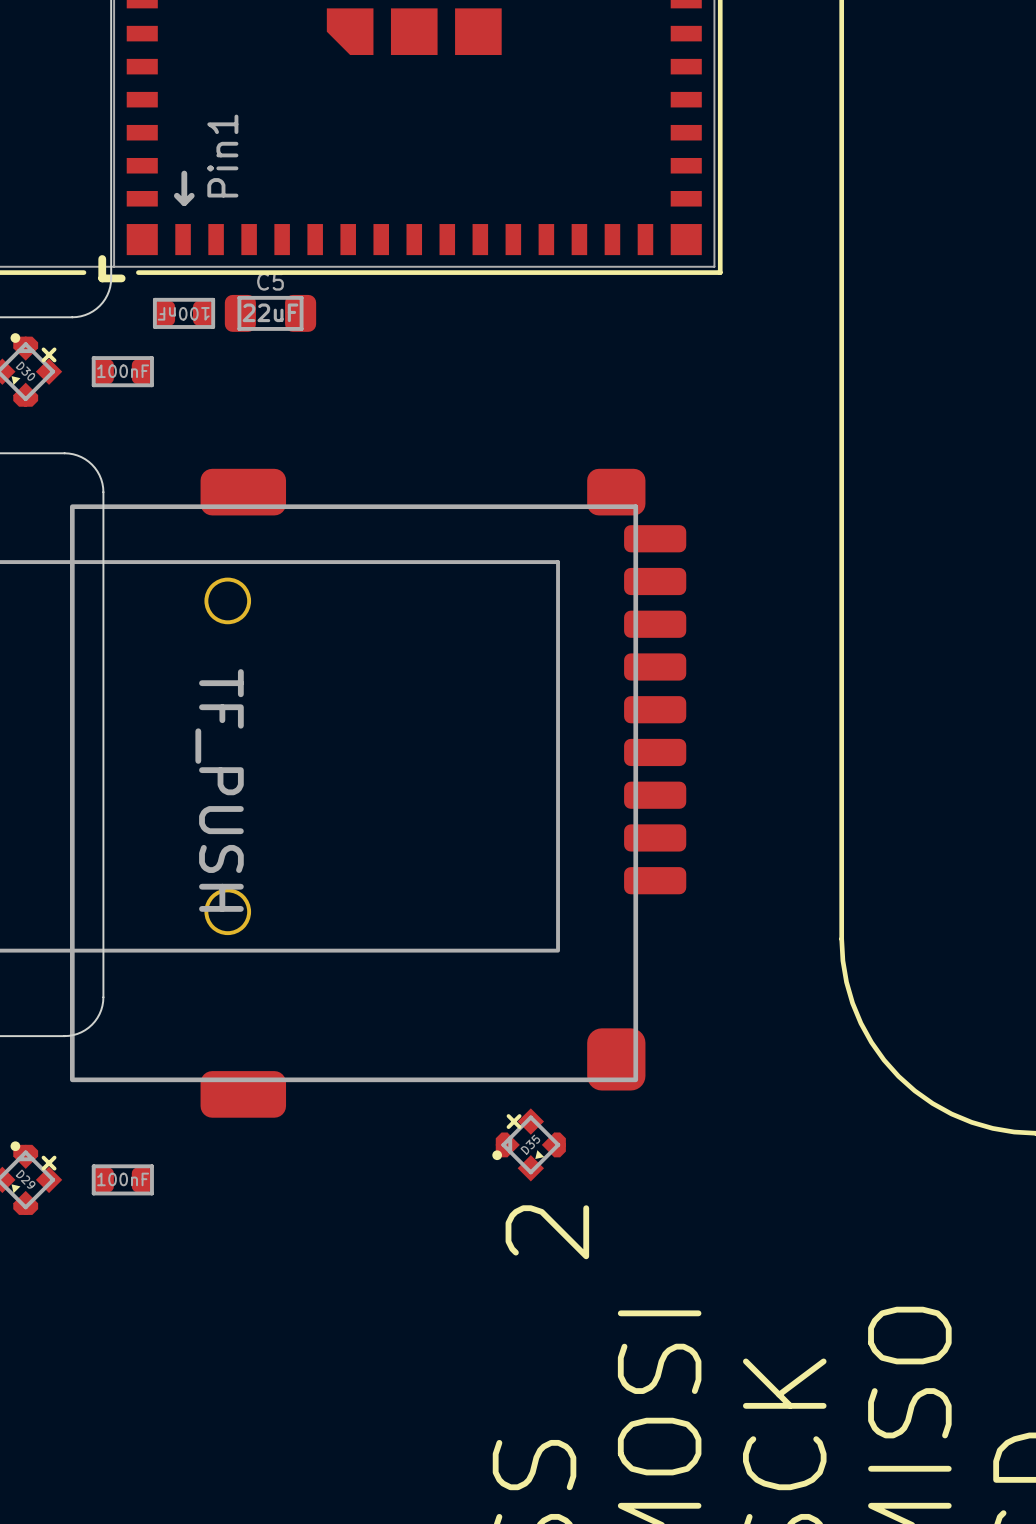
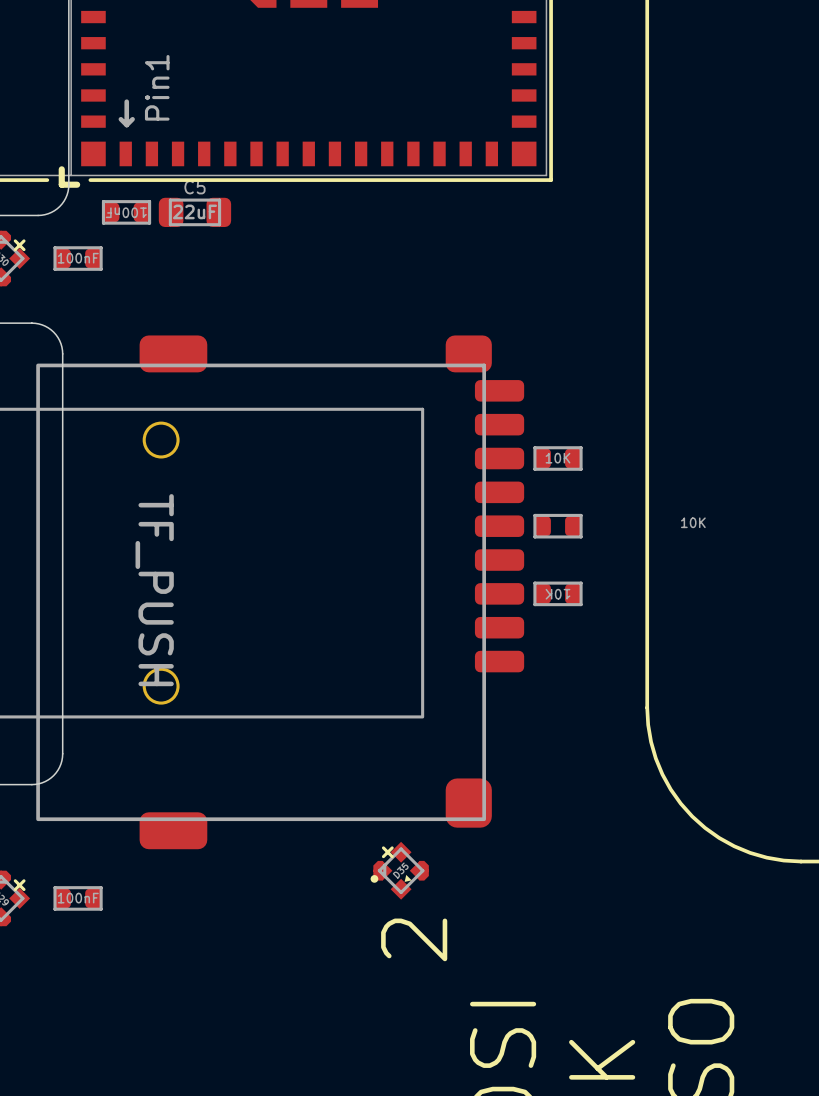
part: none -> 10K (557, 458)
part: none -> 10K (557, 526)
part: none -> 10K (557, 593)

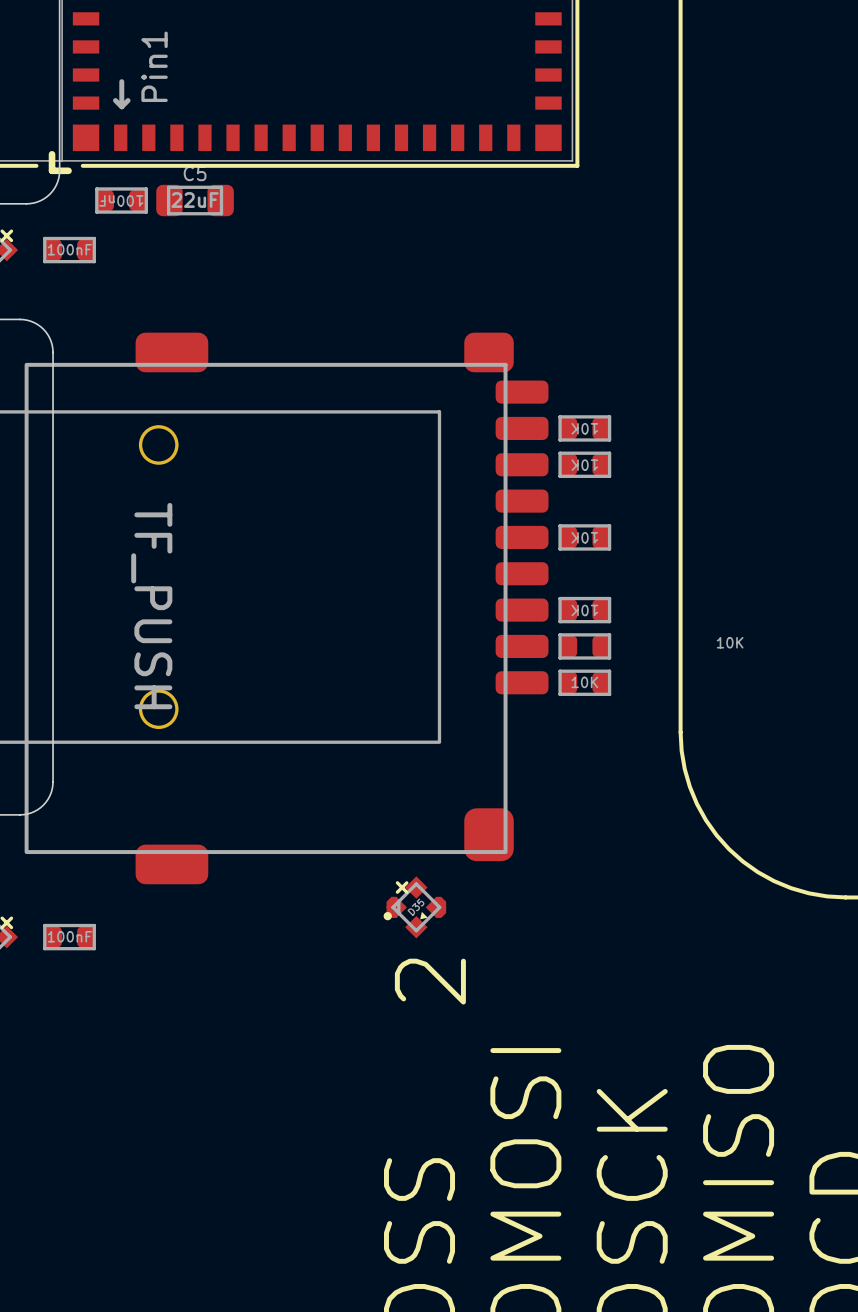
part: none -> 10K (584, 428)
part value rotation: 0° (557, 458) -> 180° (584, 465)
part value rotation: 0° (693, 522) -> 180° (584, 537)
part value position: 10K (693, 522) -> 10K (584, 537)
part: none -> 10K (584, 646)
part: none -> 10K (584, 682)

